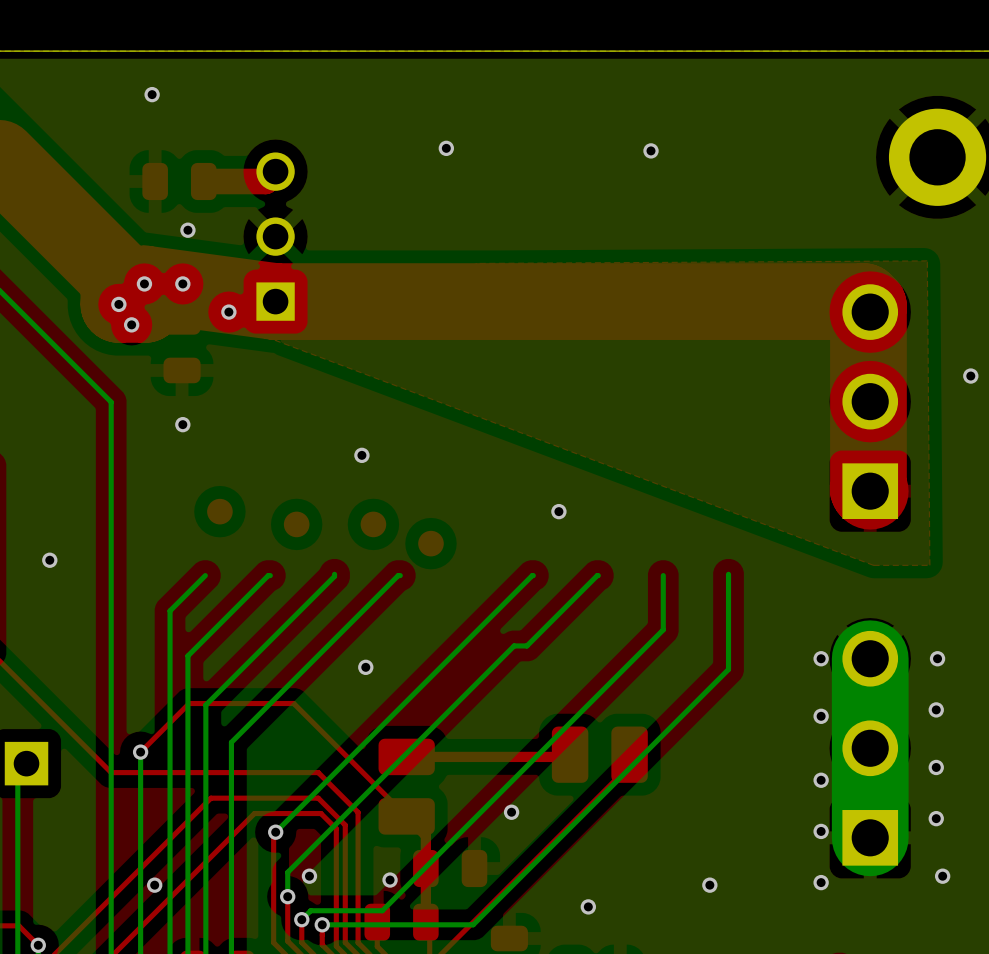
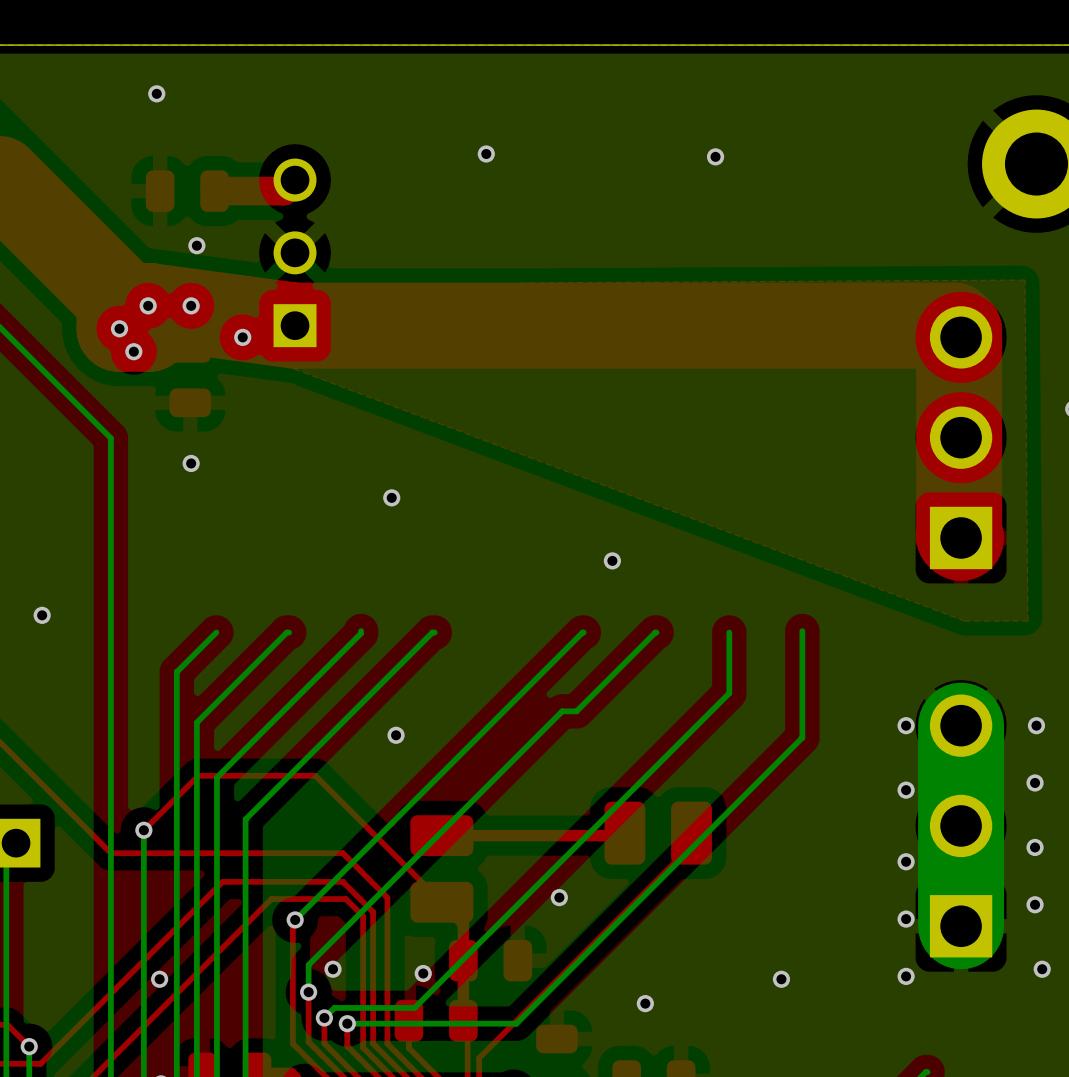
part: (219, 511) -> none
part: (296, 524) -> none
part: (373, 524) -> none
part: (430, 543) -> none

